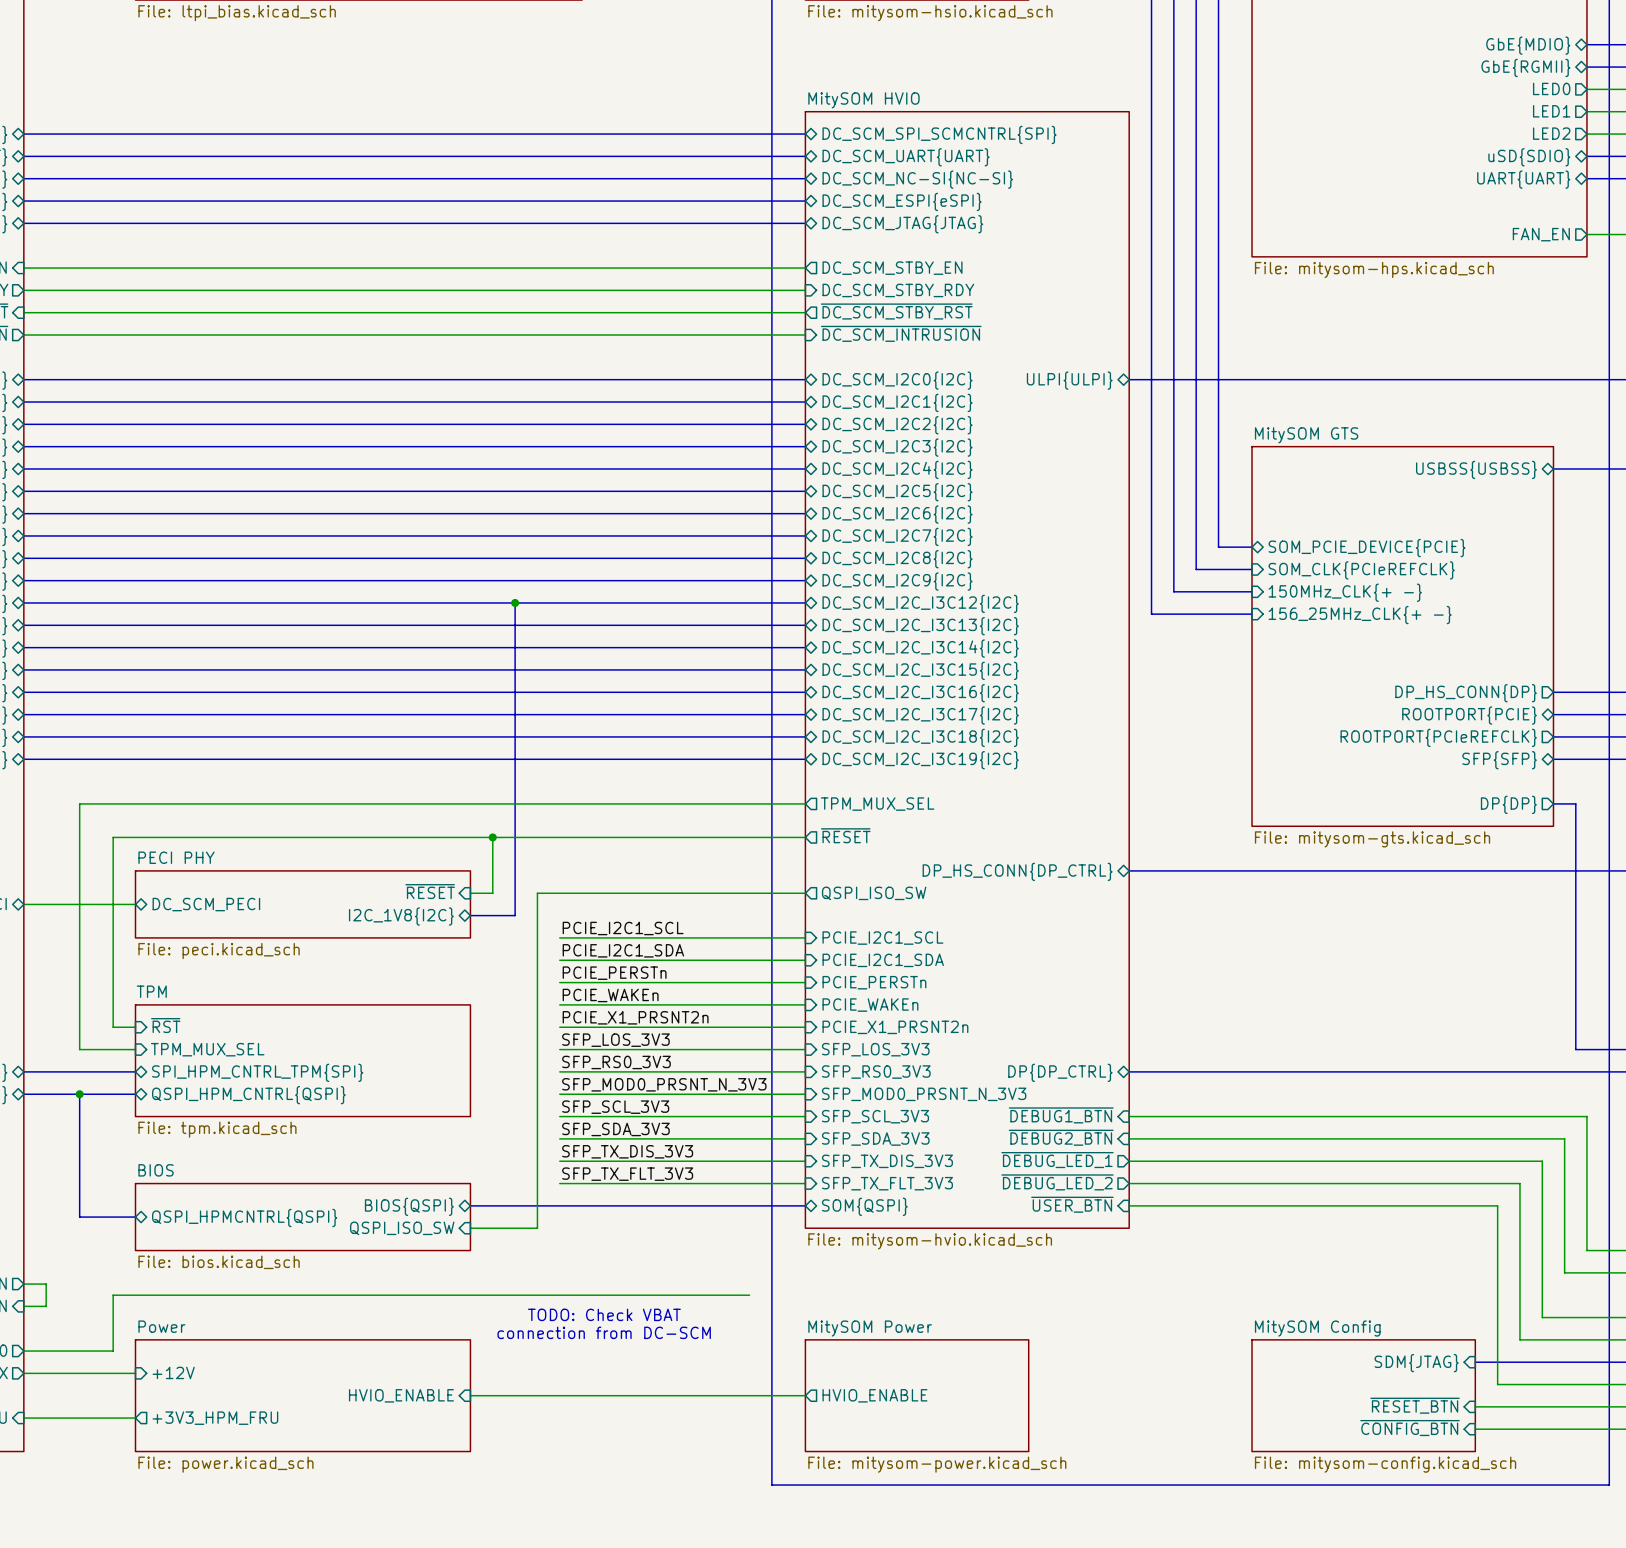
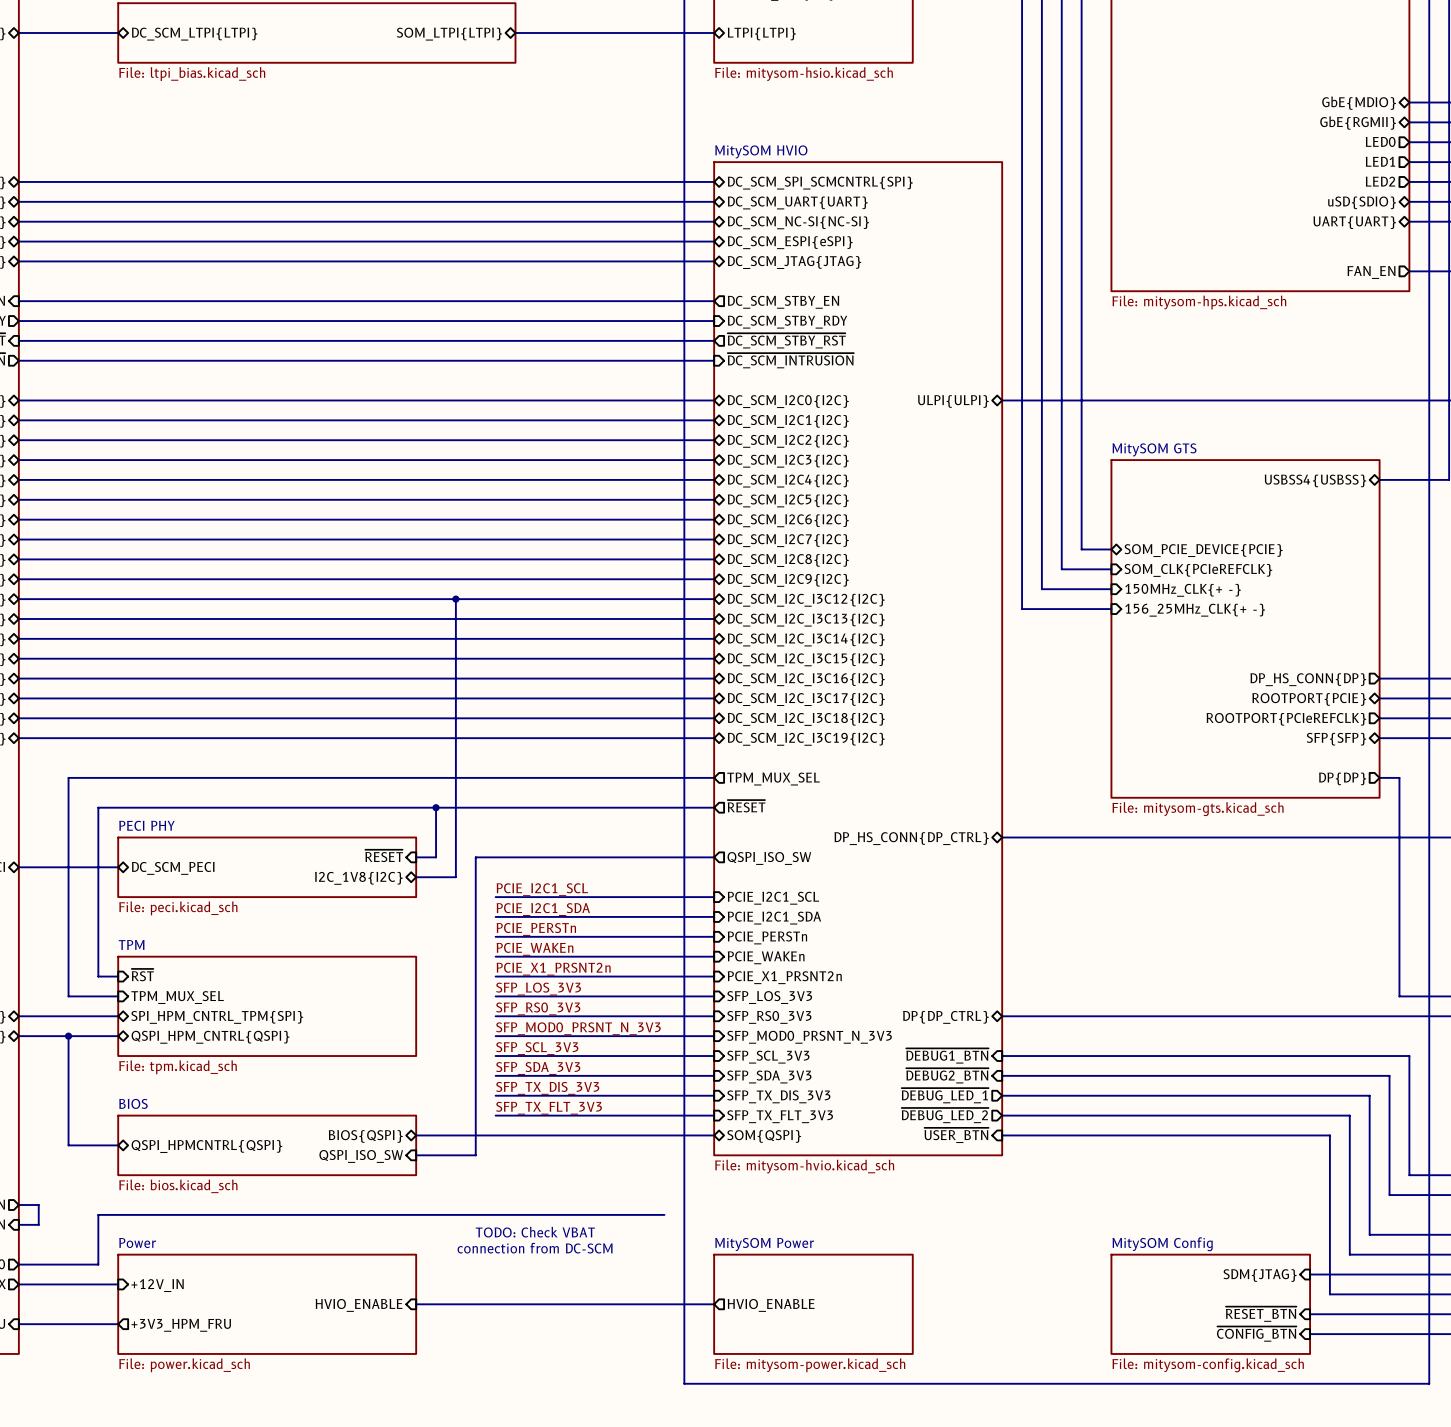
sheet pin: USBSS{USBSS} (1476, 469) -> USBSS4{USBSS} (1315, 480)
sheet pin: +12V (173, 1372) -> +12V_IN (157, 1285)

